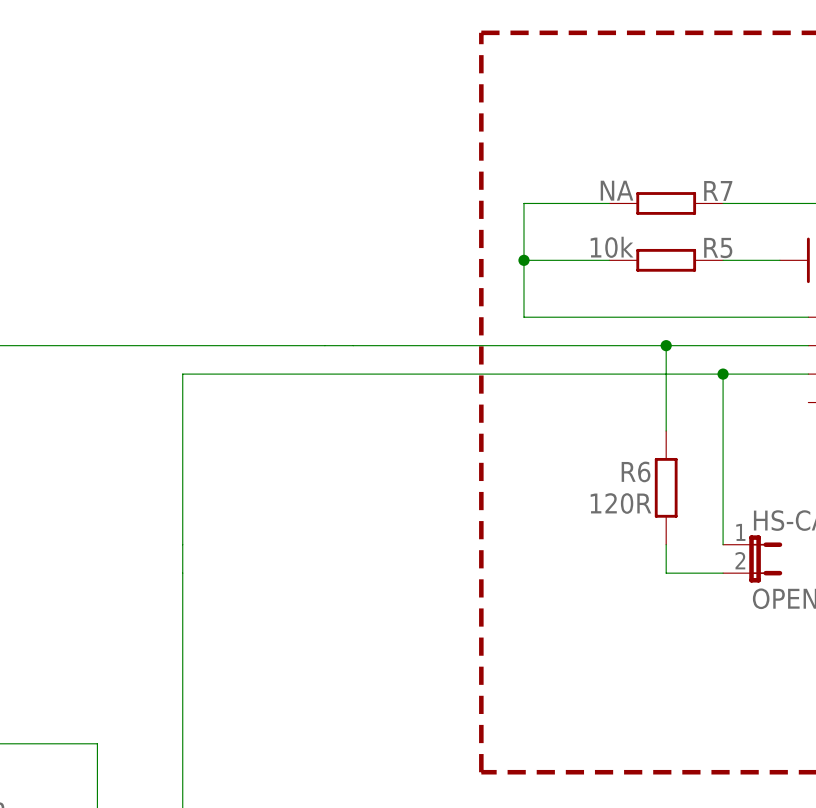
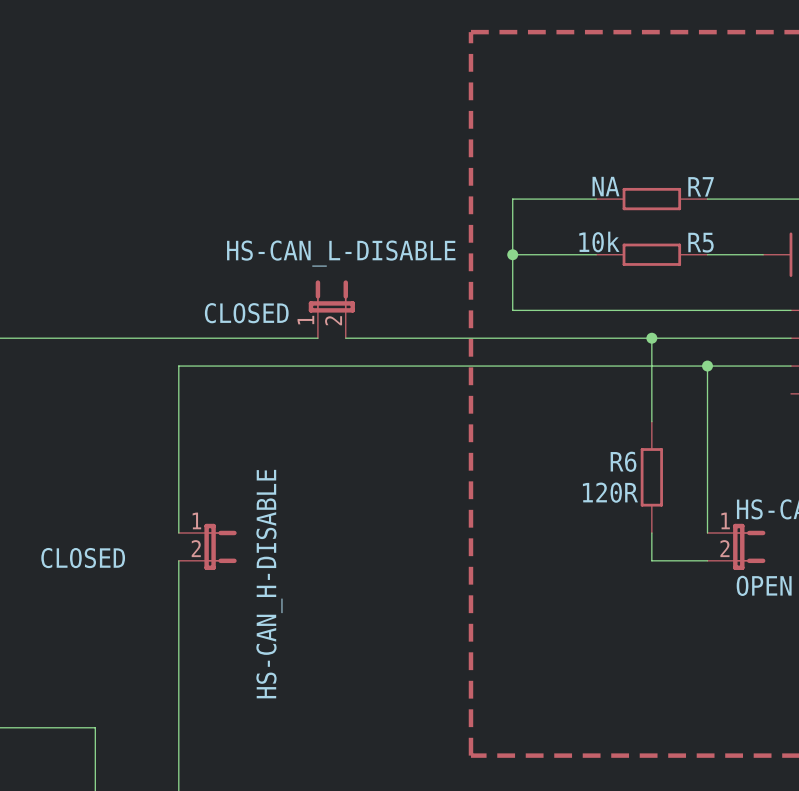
HS-CAN_L-DISABLE: none -> CLOSED (331, 309)
wire: (324, 345) (353, 345) -> none
wire: (182, 544) (182, 573) -> none
HS-CAN_H-DISABLE: none -> CLOSED (207, 546)

